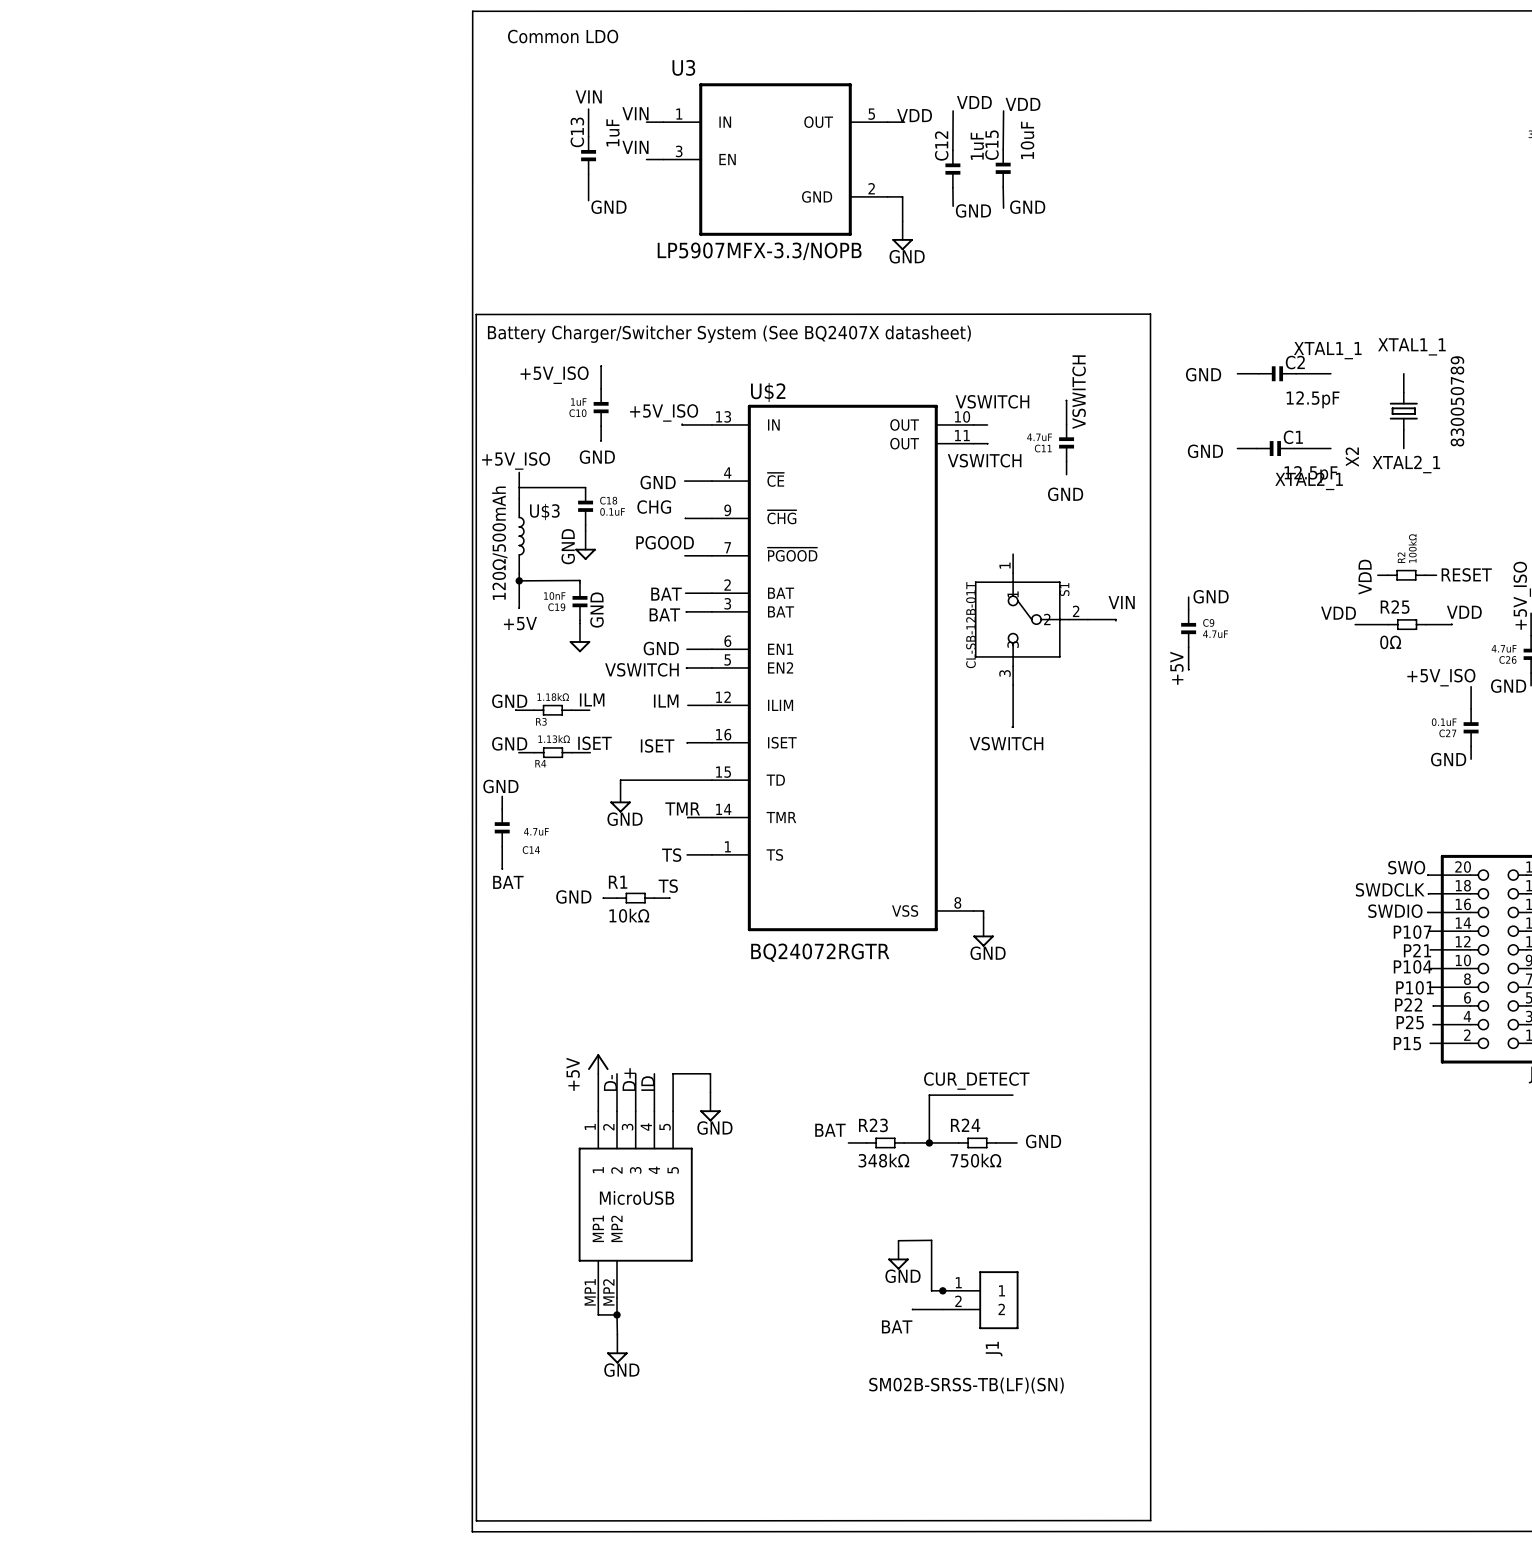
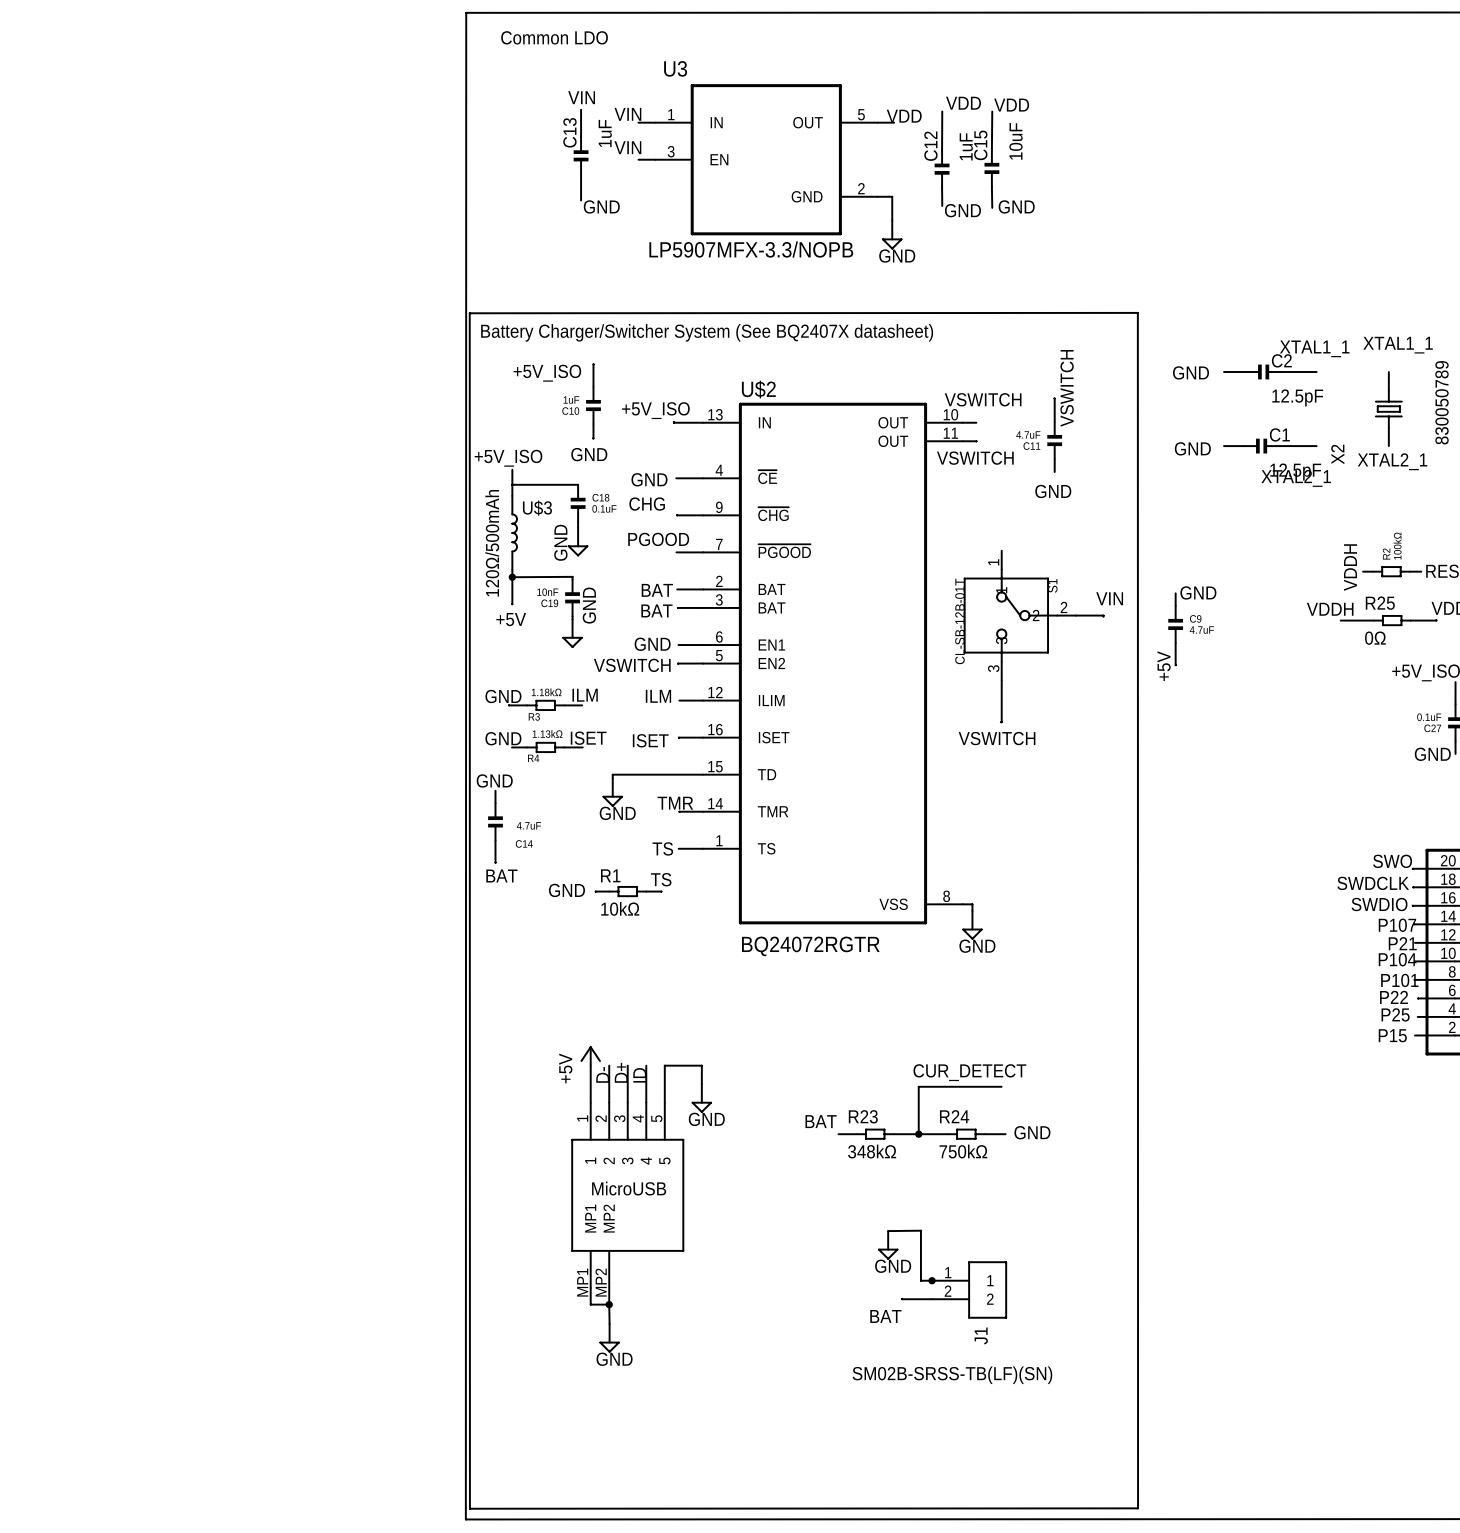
label: VDD (1365, 577) -> VDDH (1350, 567)
label: VDD (1338, 613) -> VDDH (1330, 609)

